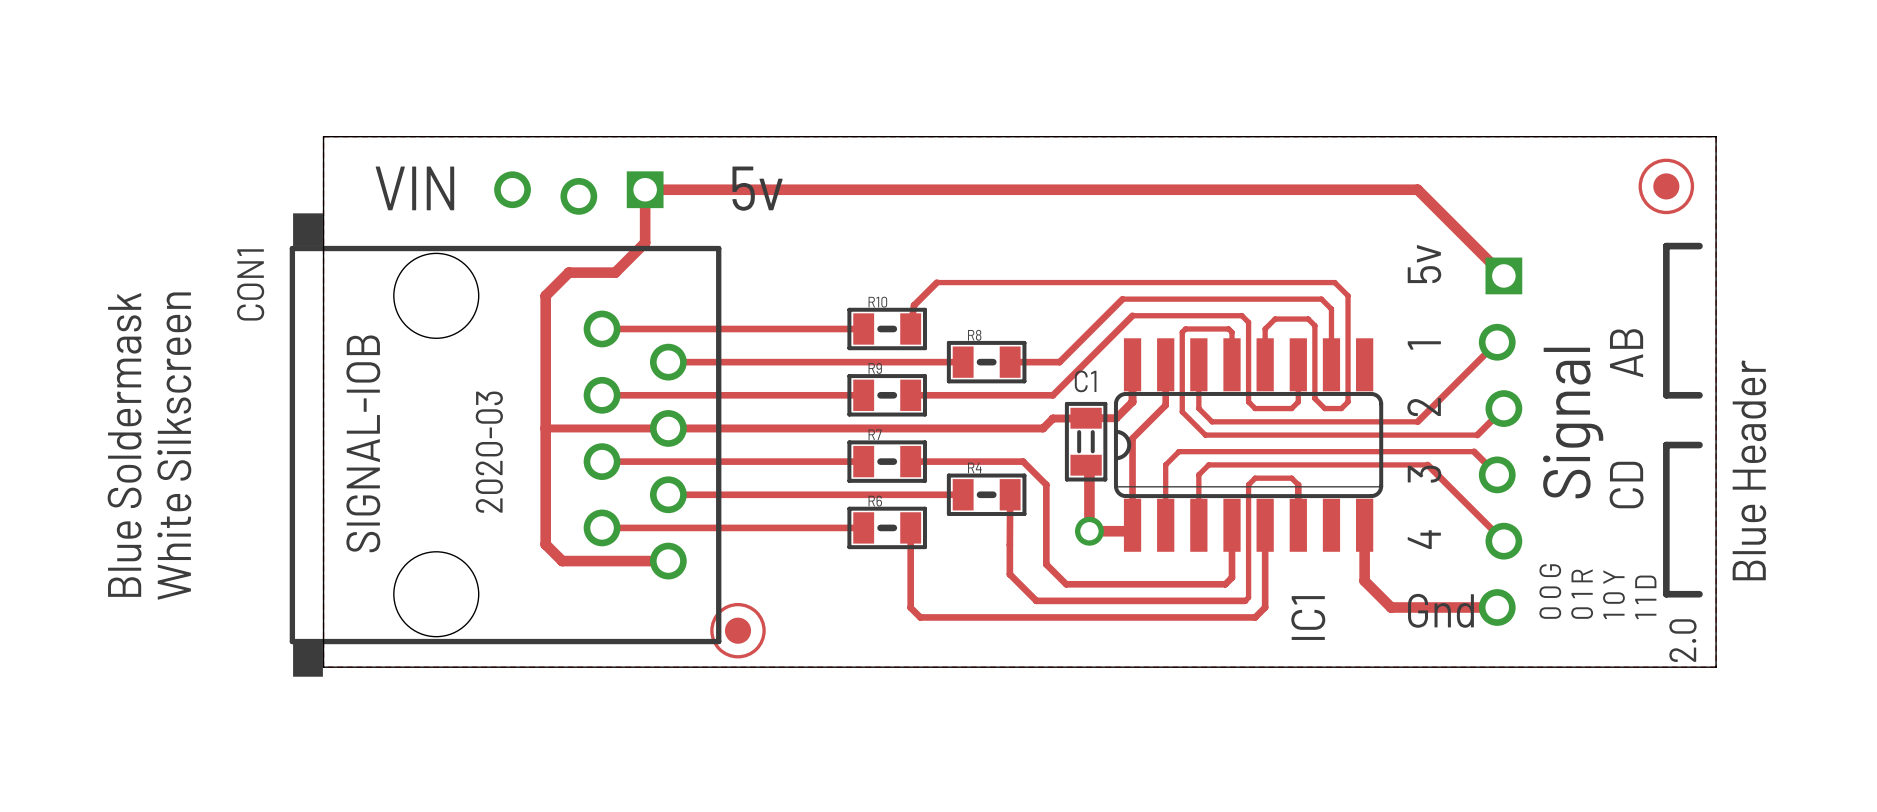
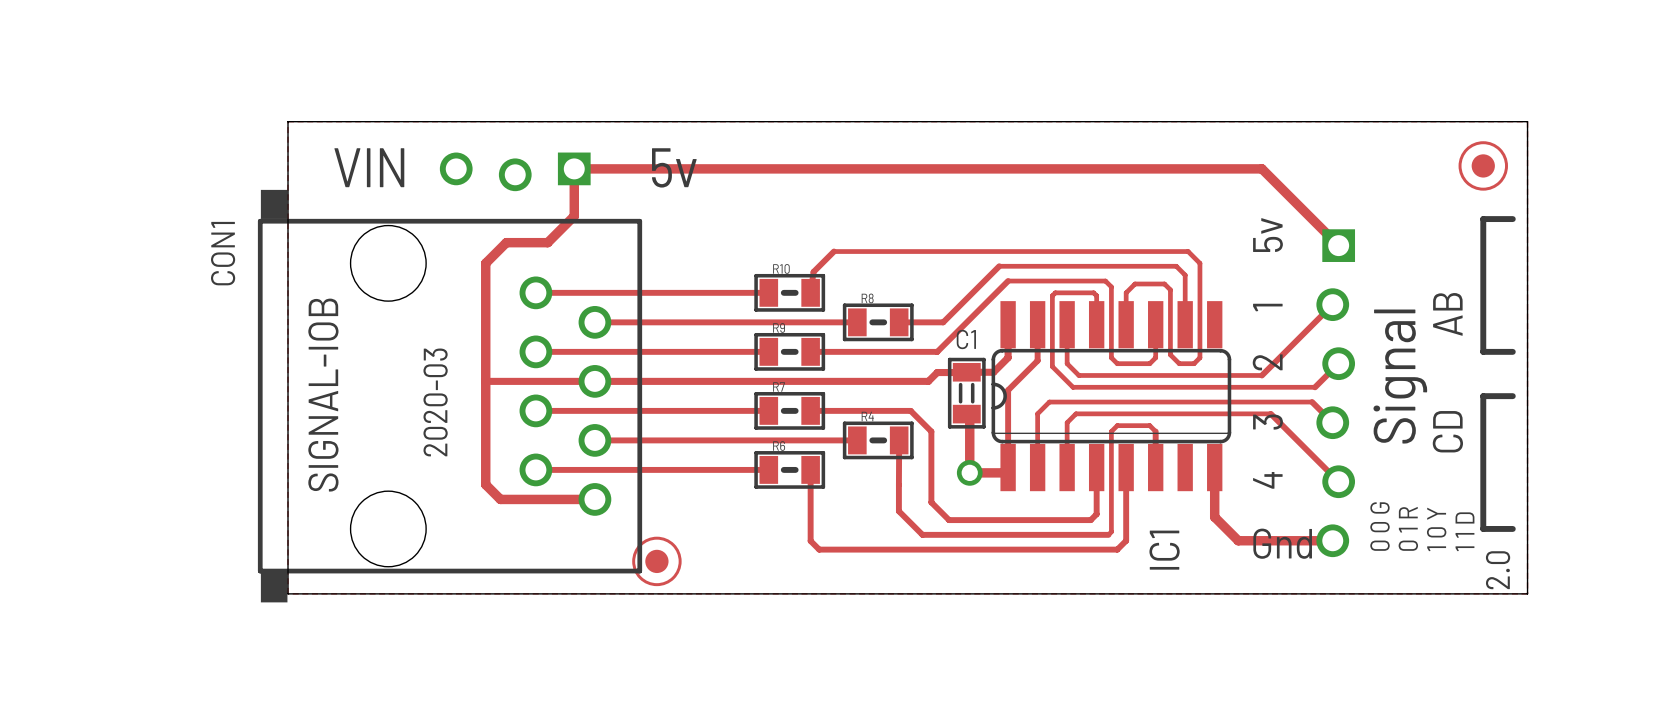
text: Blue Soldermask (124, 445) -> none
text: White Silkscreen (174, 446) -> none
text: Blue Header (1749, 470) -> none

